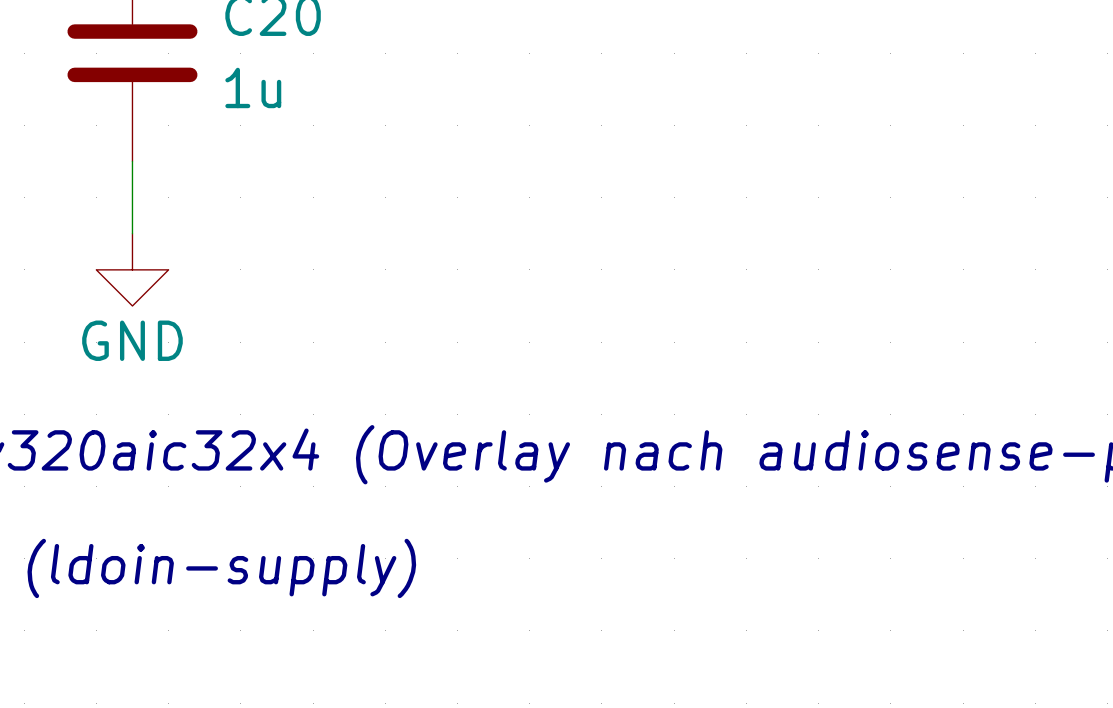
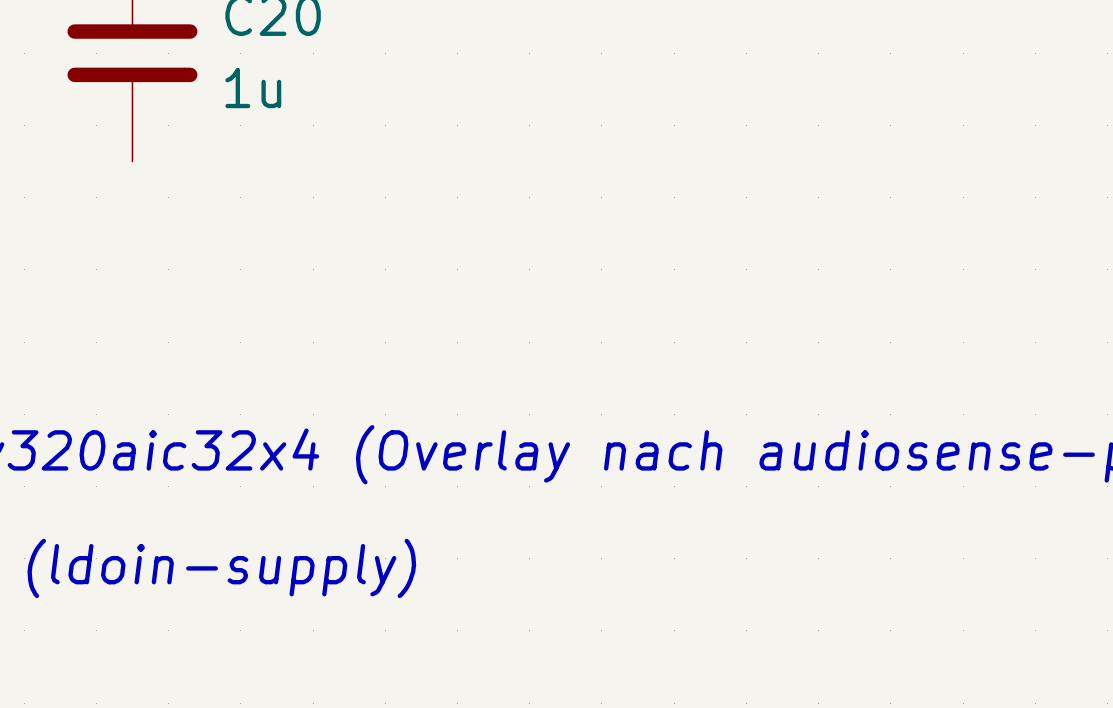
wire: (132, 161) (132, 233) -> none
power symbol: GND (132, 269) -> none

